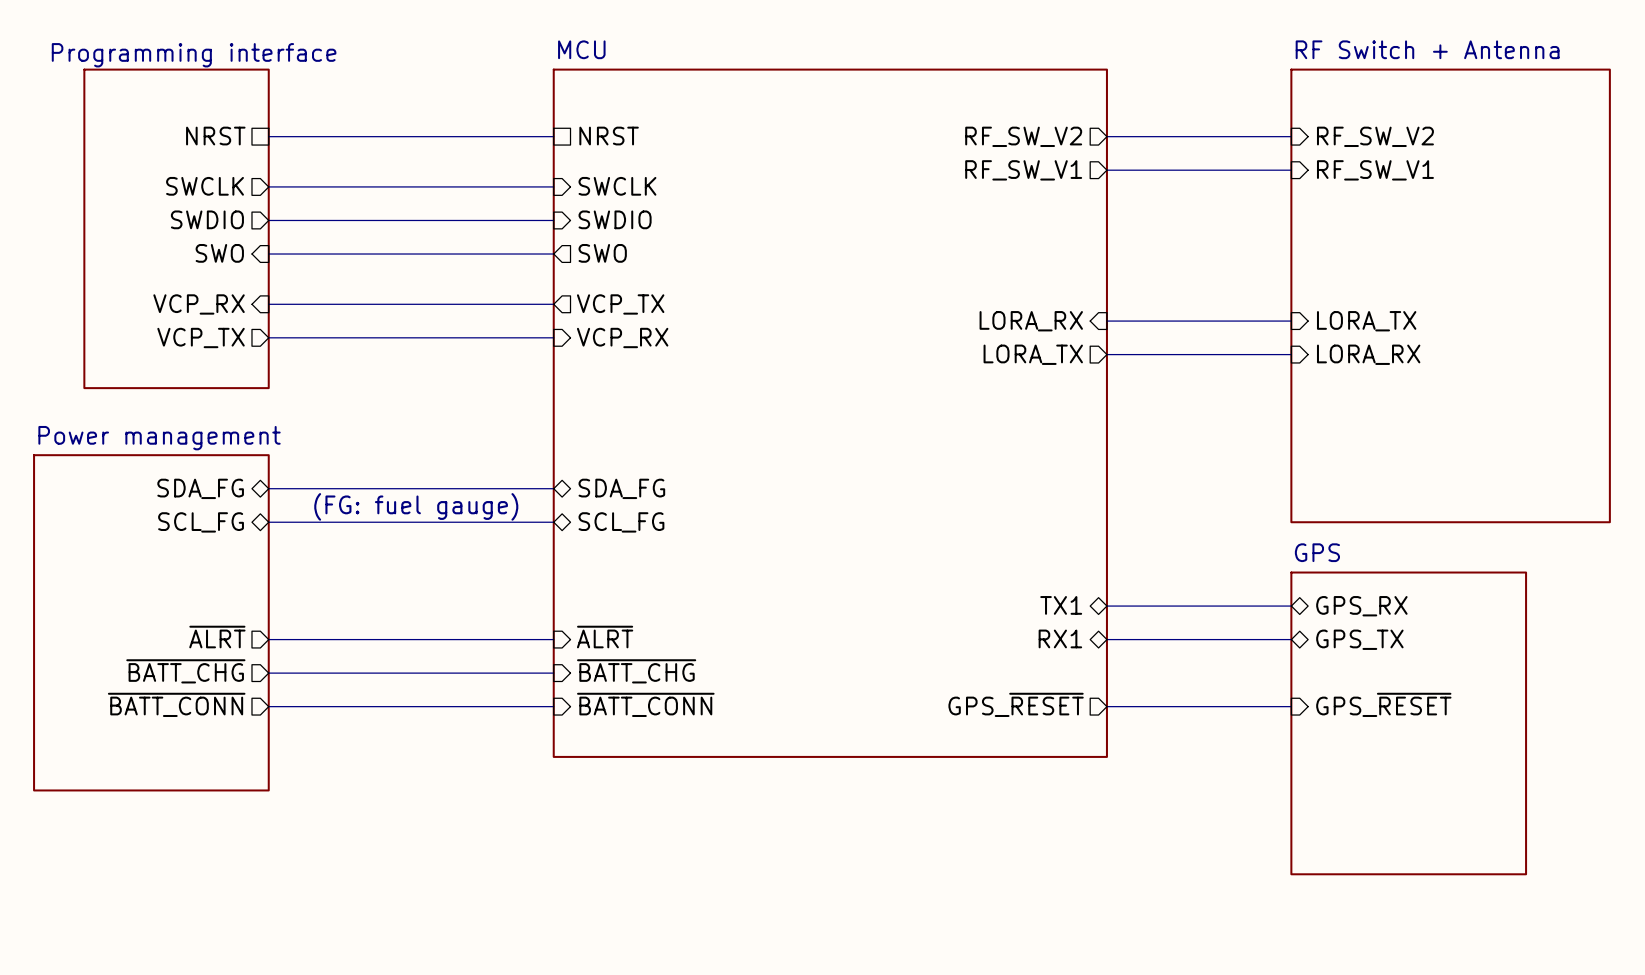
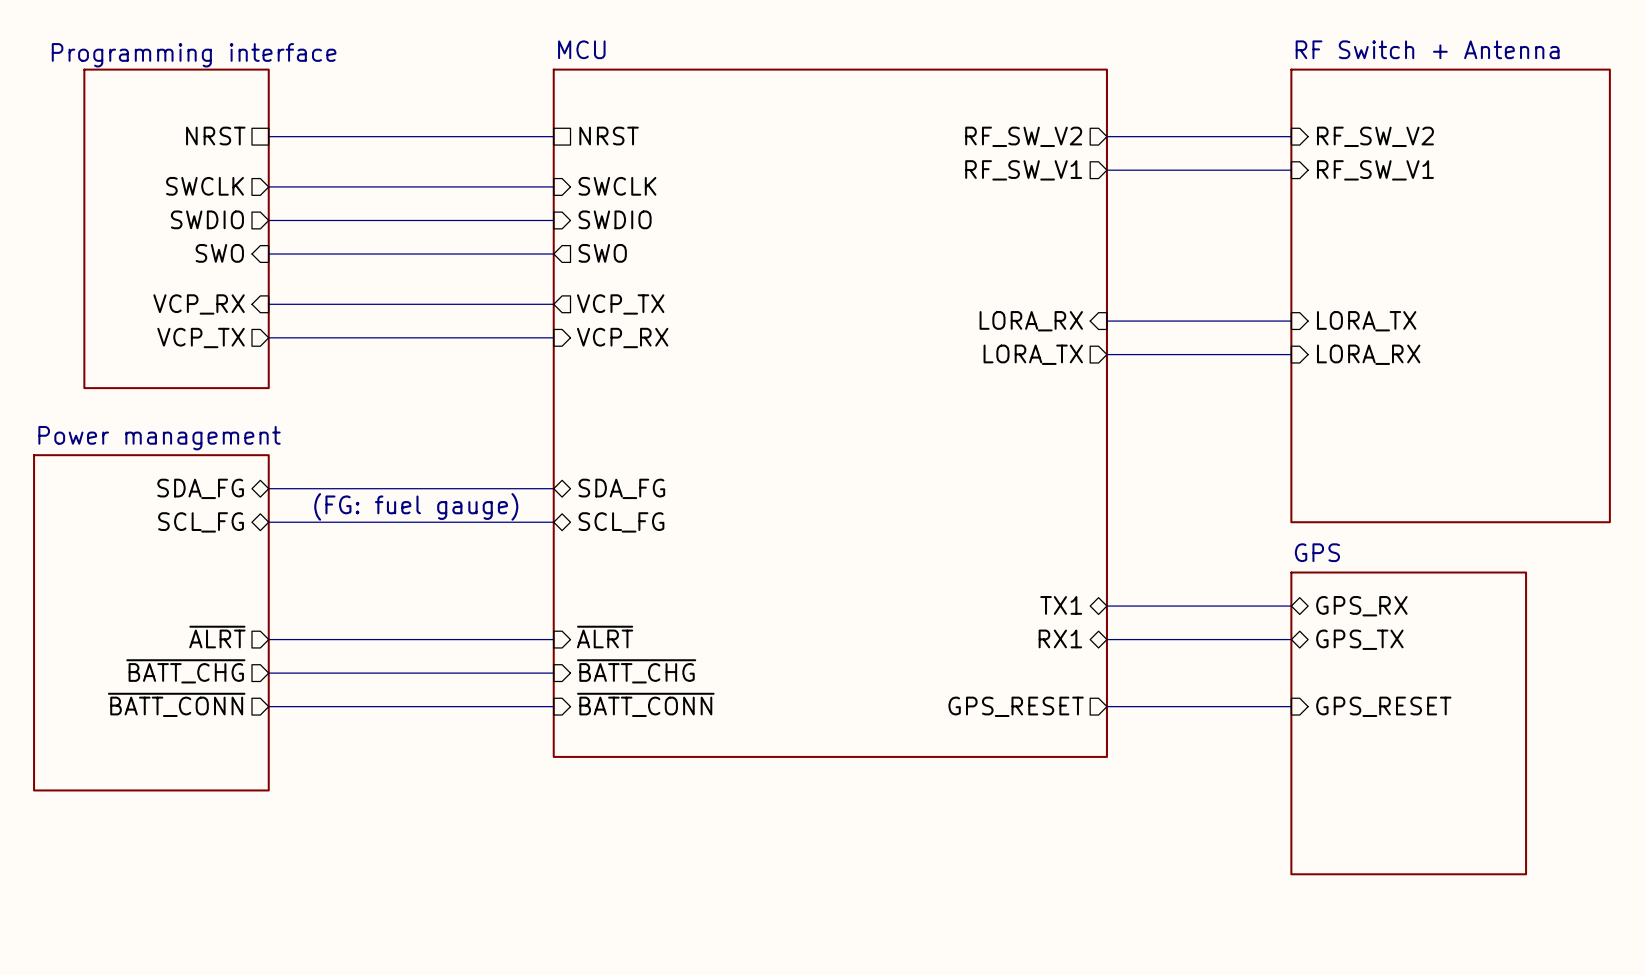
sheet pin: GPS_~{RESET} (1016, 704) -> GPS_RESET (1016, 706)
sheet pin: GPS_~{RESET} (1383, 704) -> GPS_RESET (1383, 706)

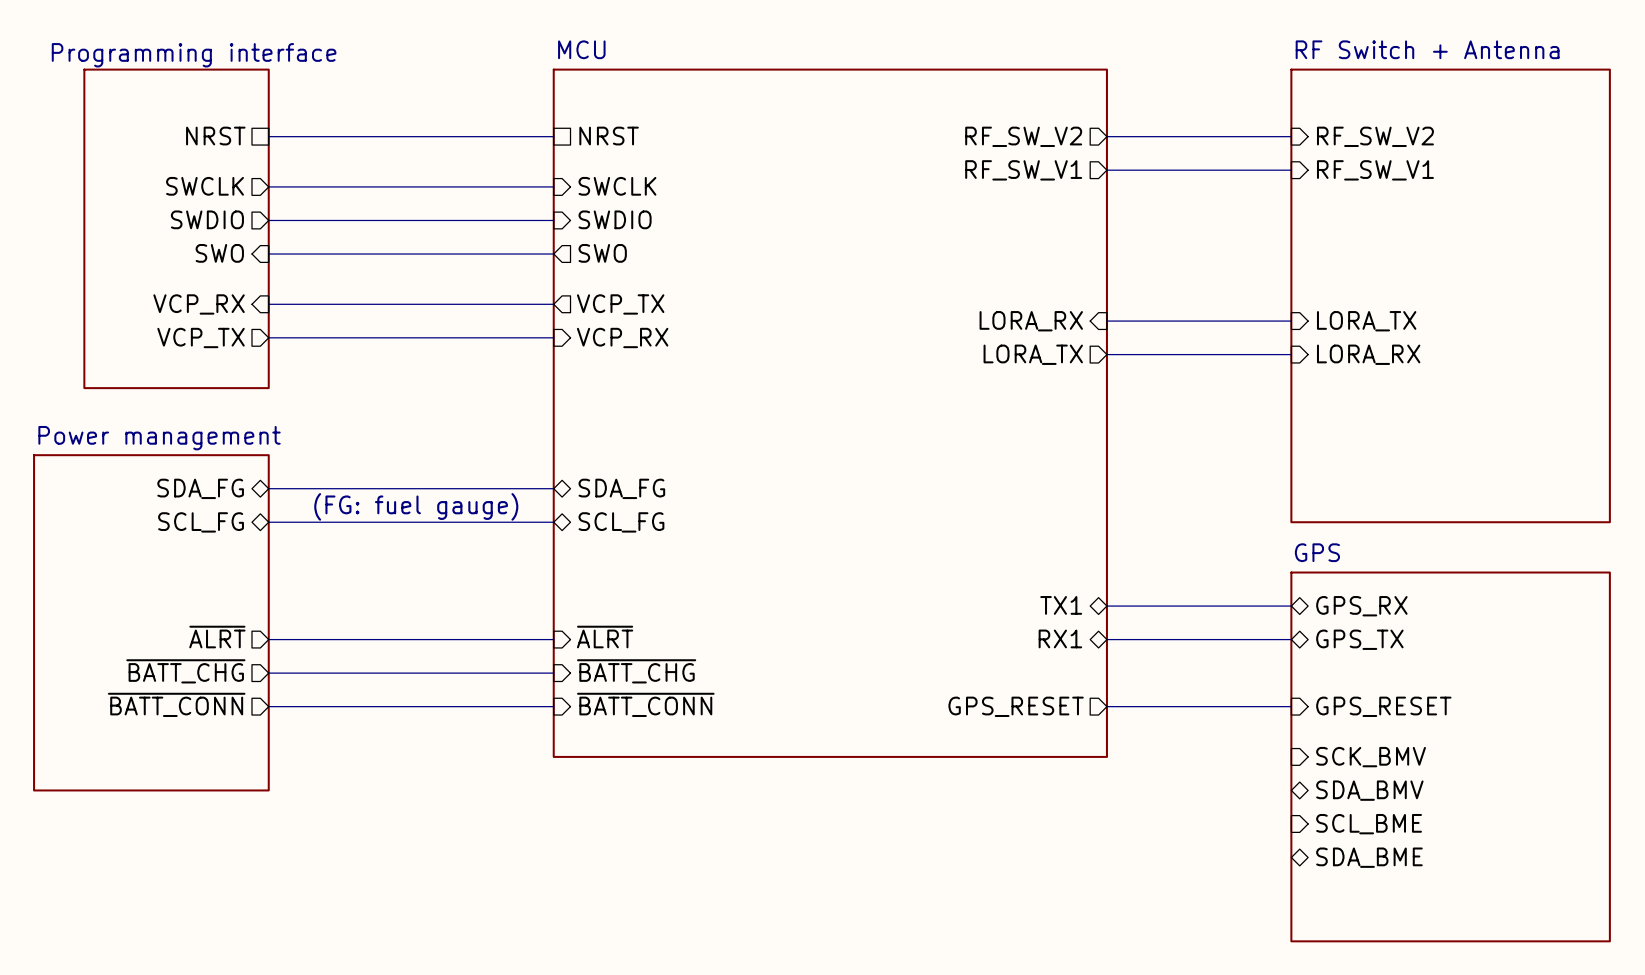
sheet GPS: (1408, 723) -> none
sheet GPS: none -> (1450, 756)
sheet pin: none -> SCK_BMV (1371, 757)
sheet pin: none -> SDA_BMV (1369, 790)
sheet pin: none -> SCL_BME (1369, 824)
sheet pin: none -> SDA_BME (1369, 857)

